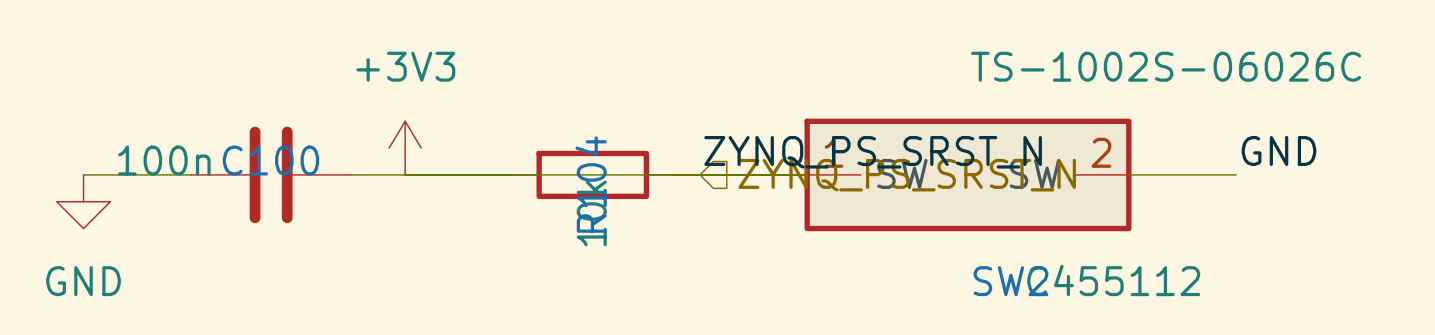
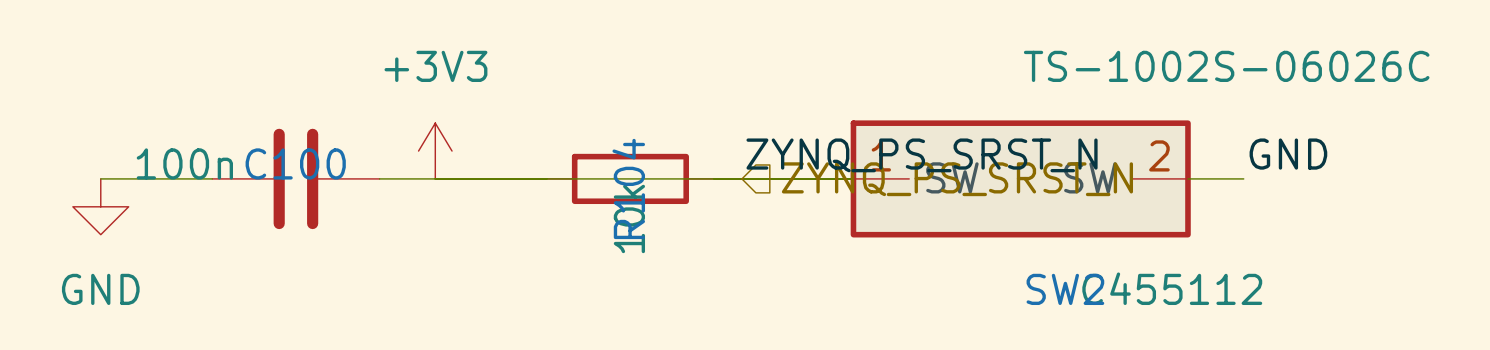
label position: GND (1279, 151) -> GND (1288, 154)
wire: (1182, 174) (1236, 174) -> none

